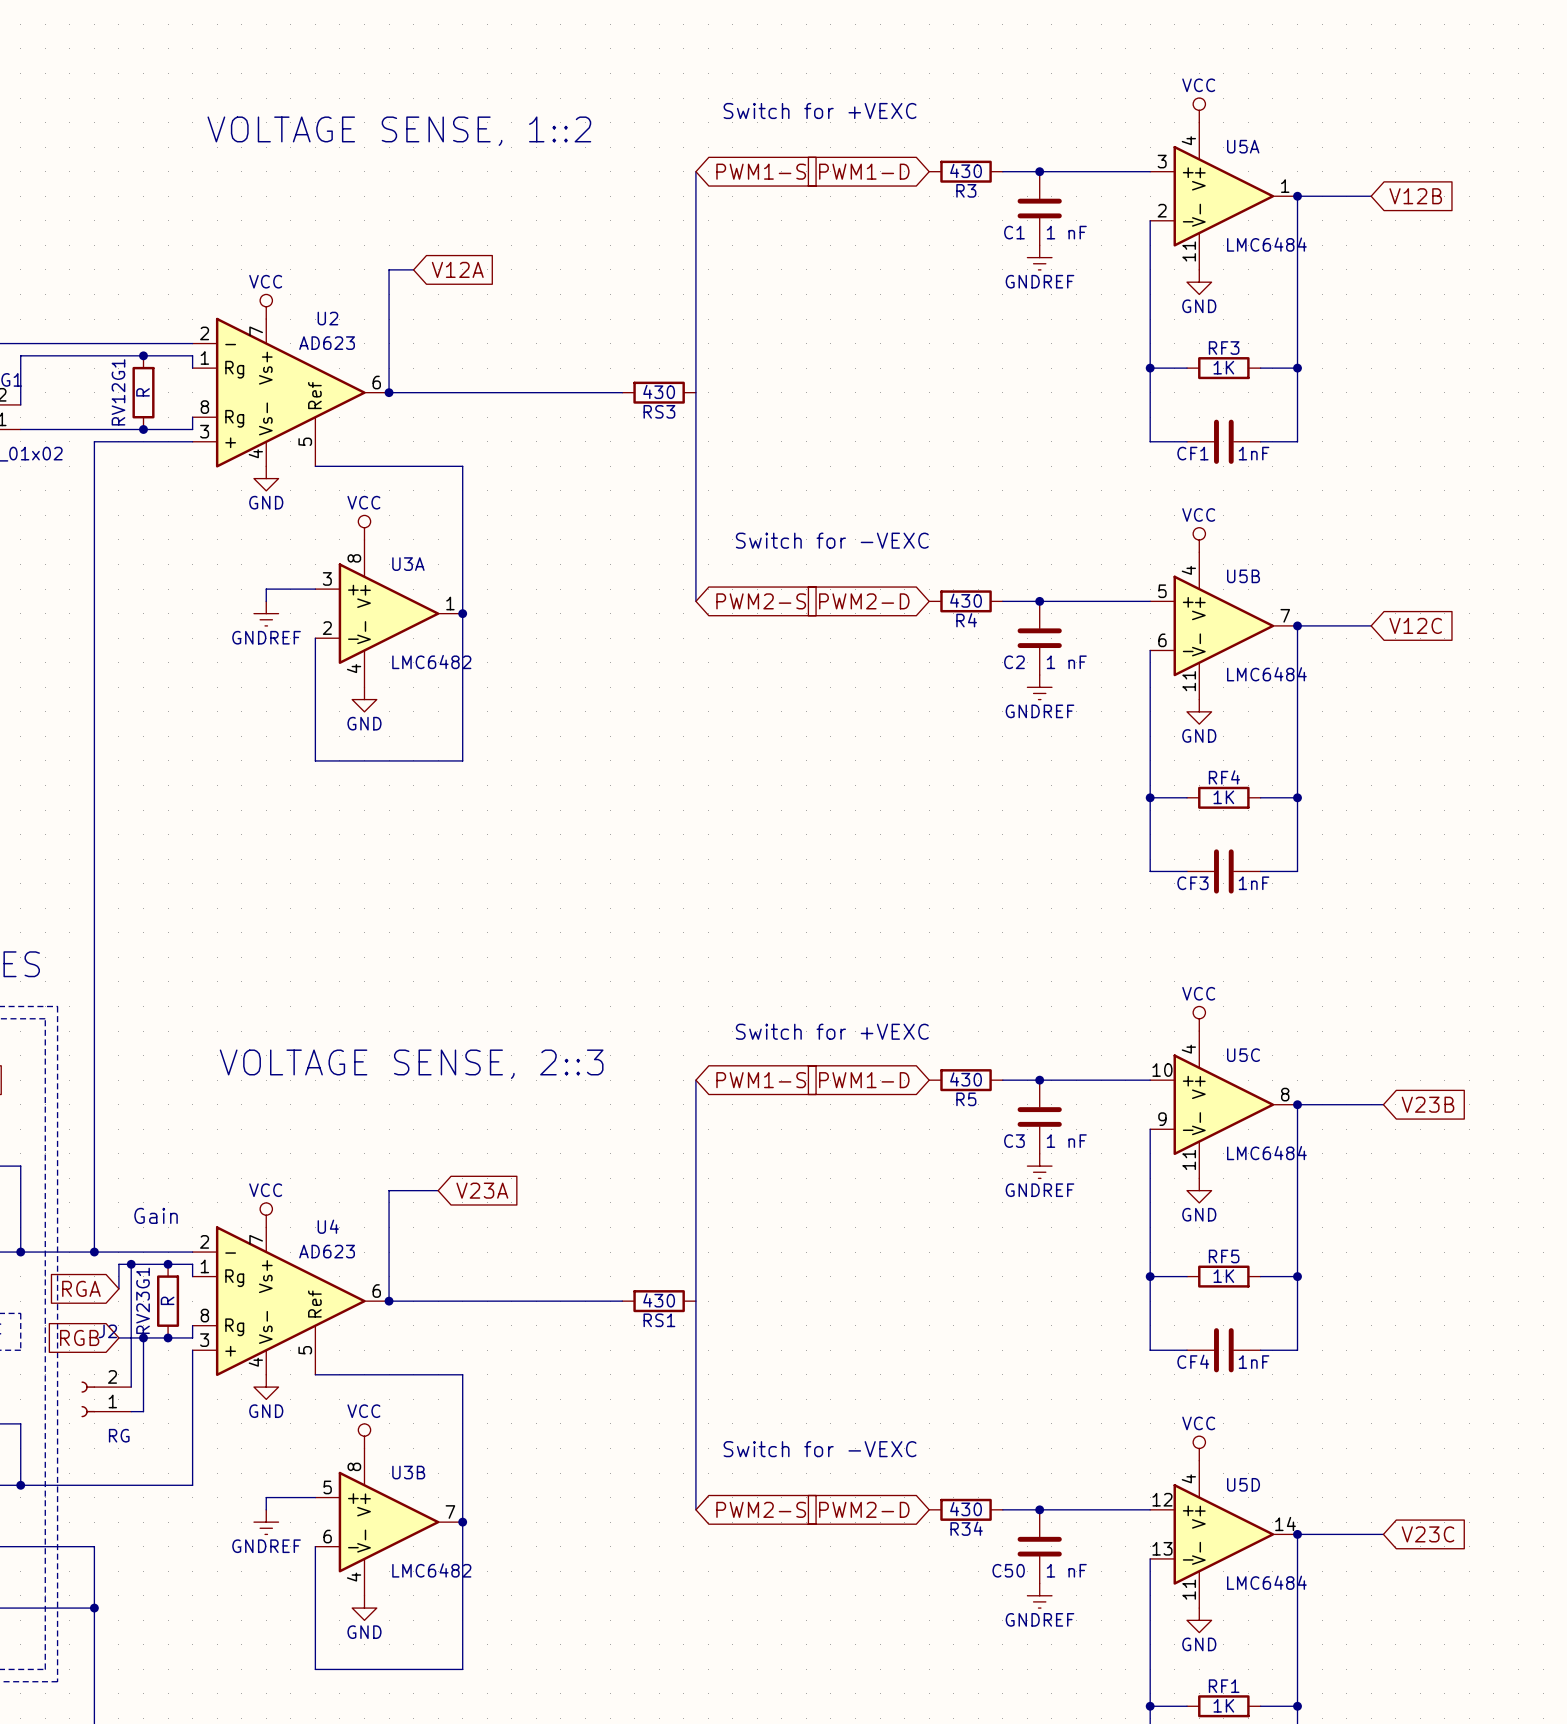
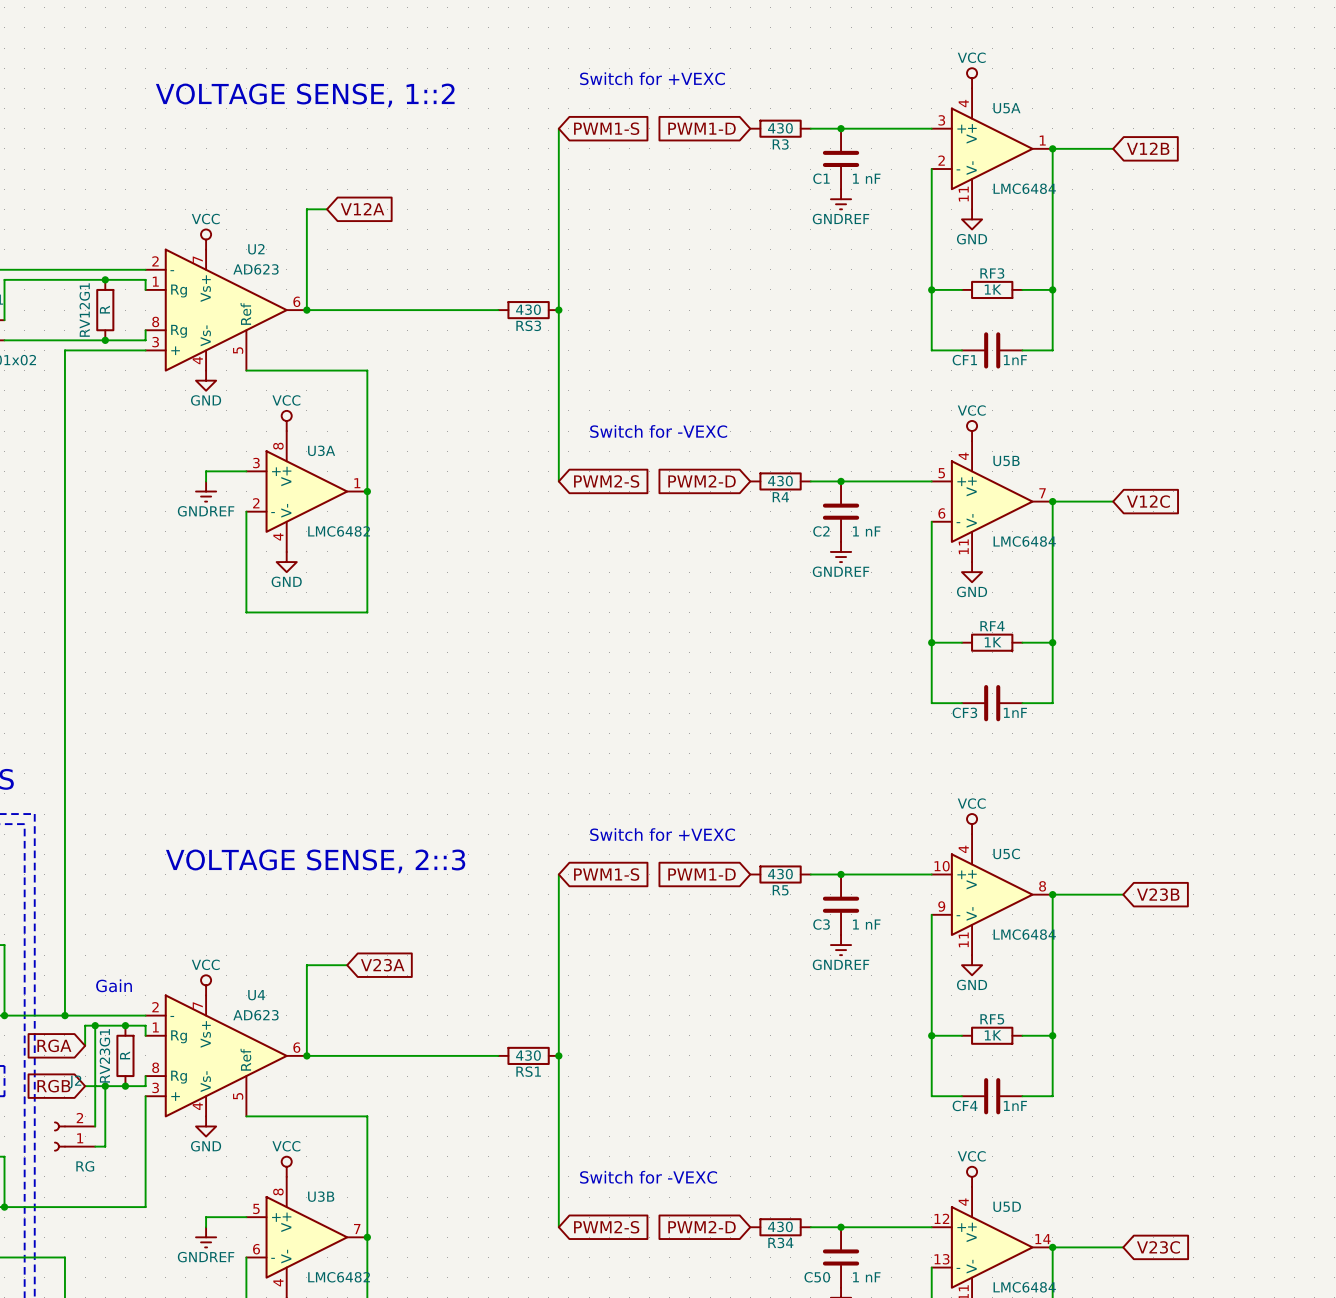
junction: none -> (558, 310)
junction: none -> (558, 1055)

